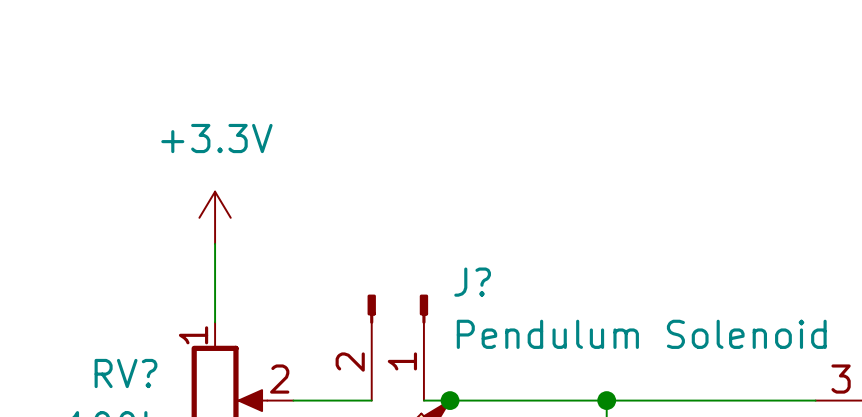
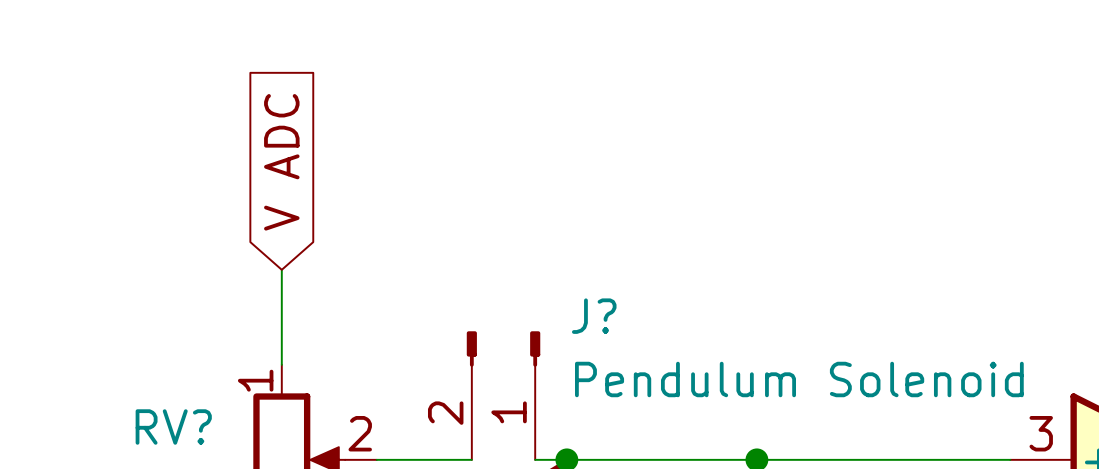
global label: none -> V ADC (281, 162)
power symbol: +3.3V (215, 217) -> none

